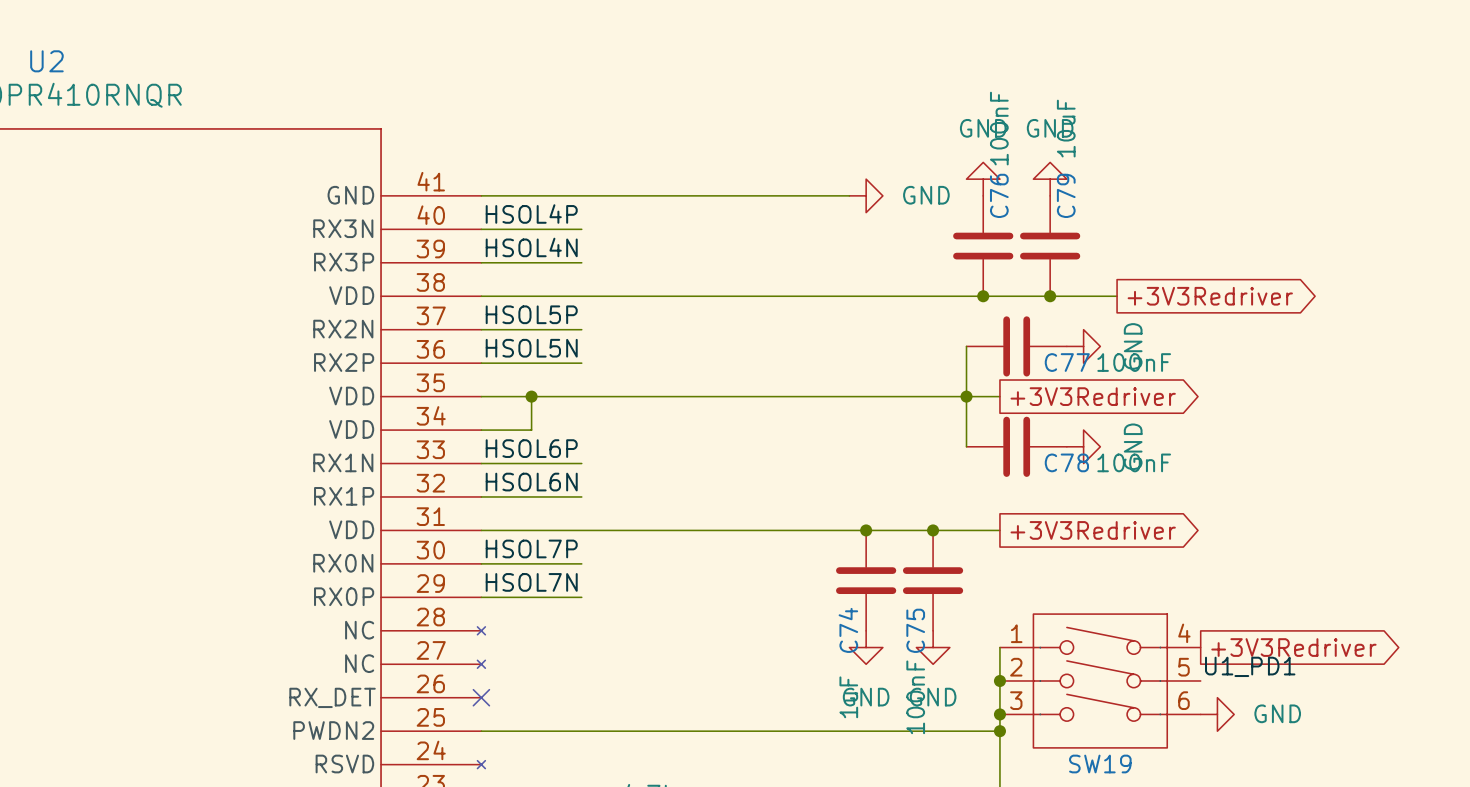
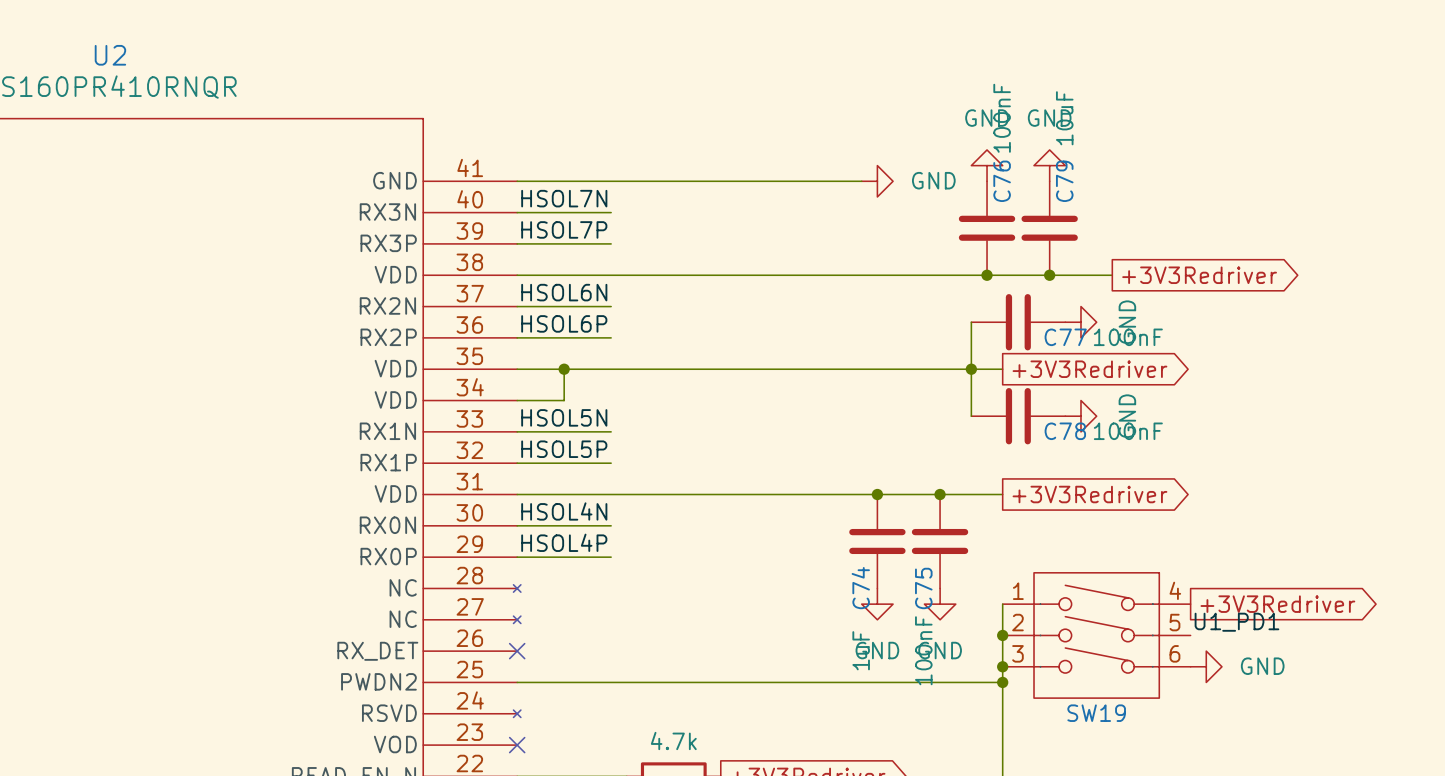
label: HSOL4P (531, 214) -> HSOL7N (564, 198)
label: HSOL4N (531, 247) -> HSOL7P (564, 229)
label: HSOL5P (531, 314) -> HSOL6N (564, 292)
label: HSOL5N (531, 348) -> HSOL6P (564, 323)
label: HSOL6P (531, 448) -> HSOL5N (564, 417)
label: HSOL6N (531, 482) -> HSOL5P (564, 449)
label: HSOL7P (531, 548) -> HSOL4N (564, 511)
label: HSOL7N (531, 582) -> HSOL4P (564, 542)

